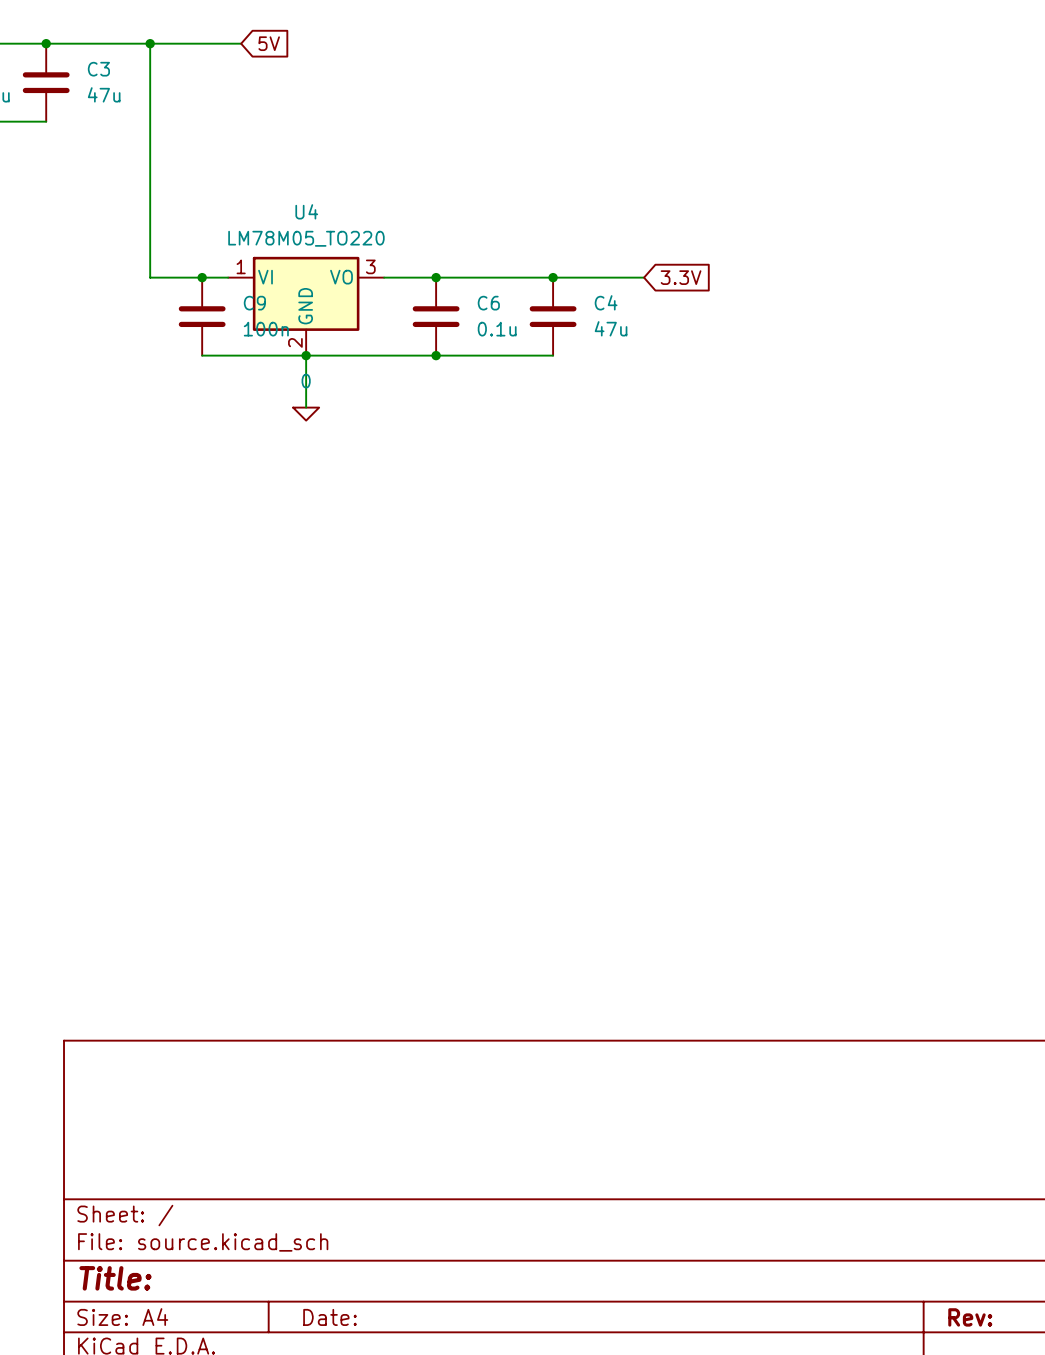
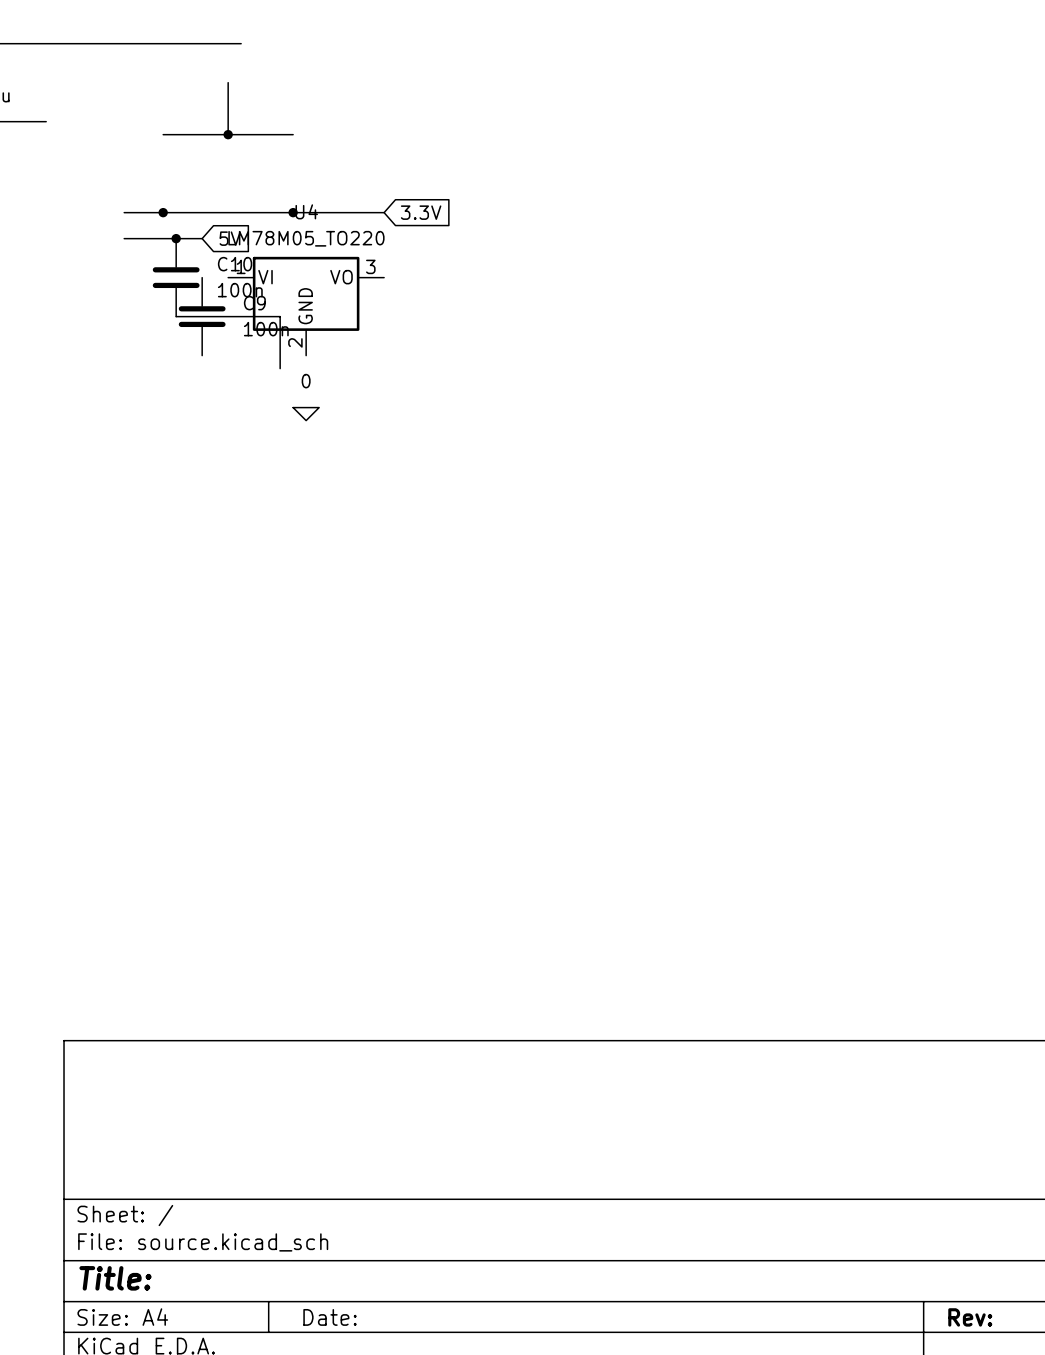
junction: (46, 43) -> none
wire: (150, 43) (150, 277) (228, 277) -> none
junction: (150, 43) -> none
global label: 5V (269, 43) -> none
C3: 47u (46, 82) -> none
wire: none -> (228, 82) (228, 134)
wire: none -> (163, 134) (293, 134)
junction: none -> (228, 134)
wire: none -> (124, 212) (384, 212)
junction: none -> (163, 212)
junction: none -> (293, 212)
global label: none -> 3.3V (421, 212)
wire: none -> (124, 238) (202, 238)
junction: none -> (176, 238)
global label: none -> 5V (230, 238)
C10: none -> 100n (176, 277)
junction: (202, 277) -> none
wire: (384, 277) (644, 277) -> none
junction: (436, 277) -> none
junction: (553, 277) -> none
global label: 3.3V (681, 277) -> none
wire: none -> (176, 316) (280, 316) (280, 368)
C6: 0.1u (436, 316) -> none
C4: 47u (553, 316) -> none
wire: (202, 355) (553, 355) -> none
wire: (306, 355) (306, 407) -> none
junction: (306, 355) -> none
junction: (436, 355) -> none

